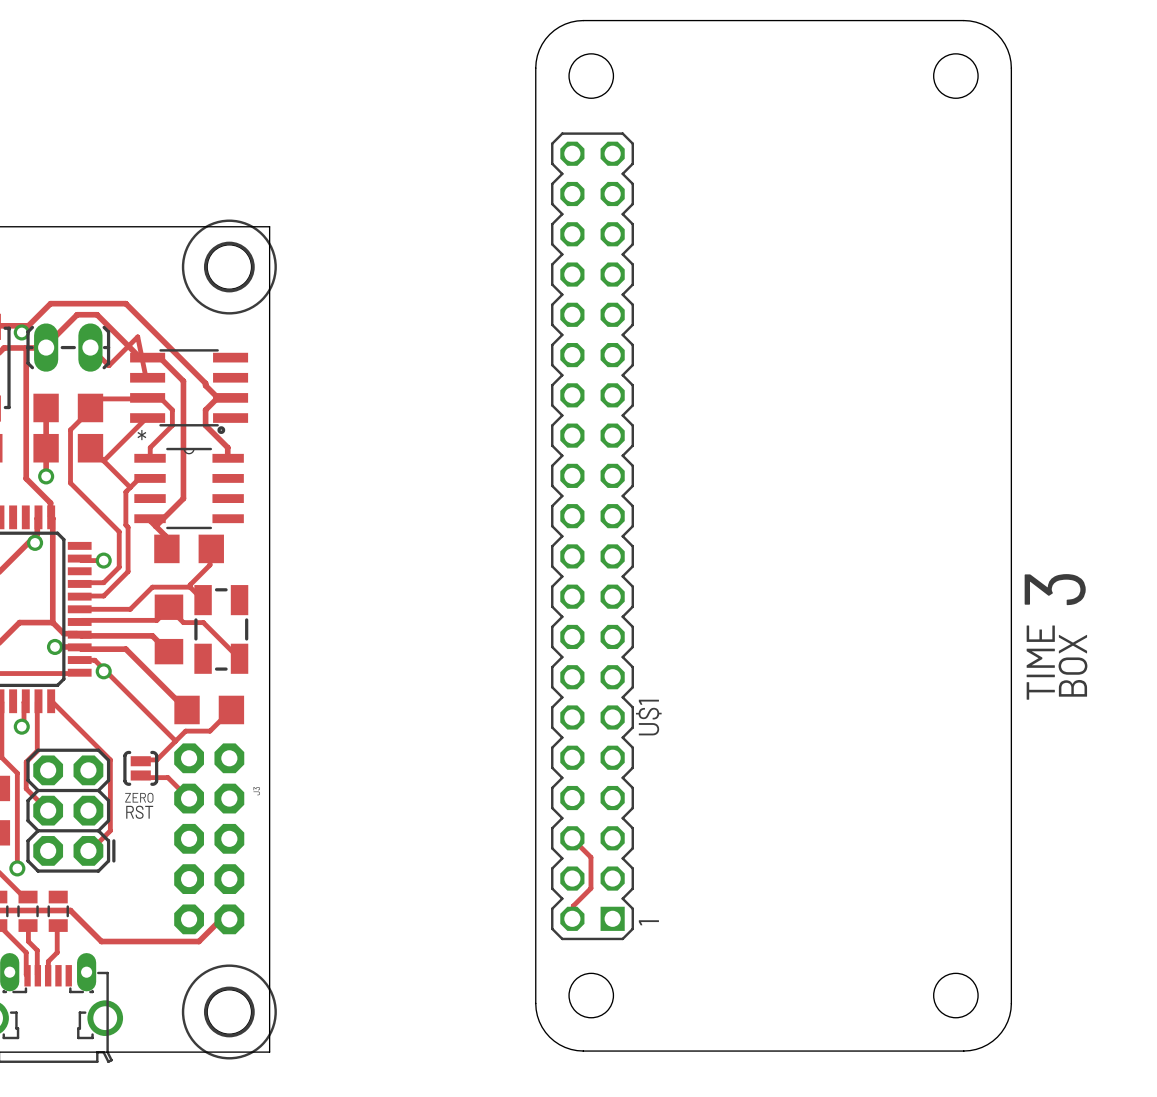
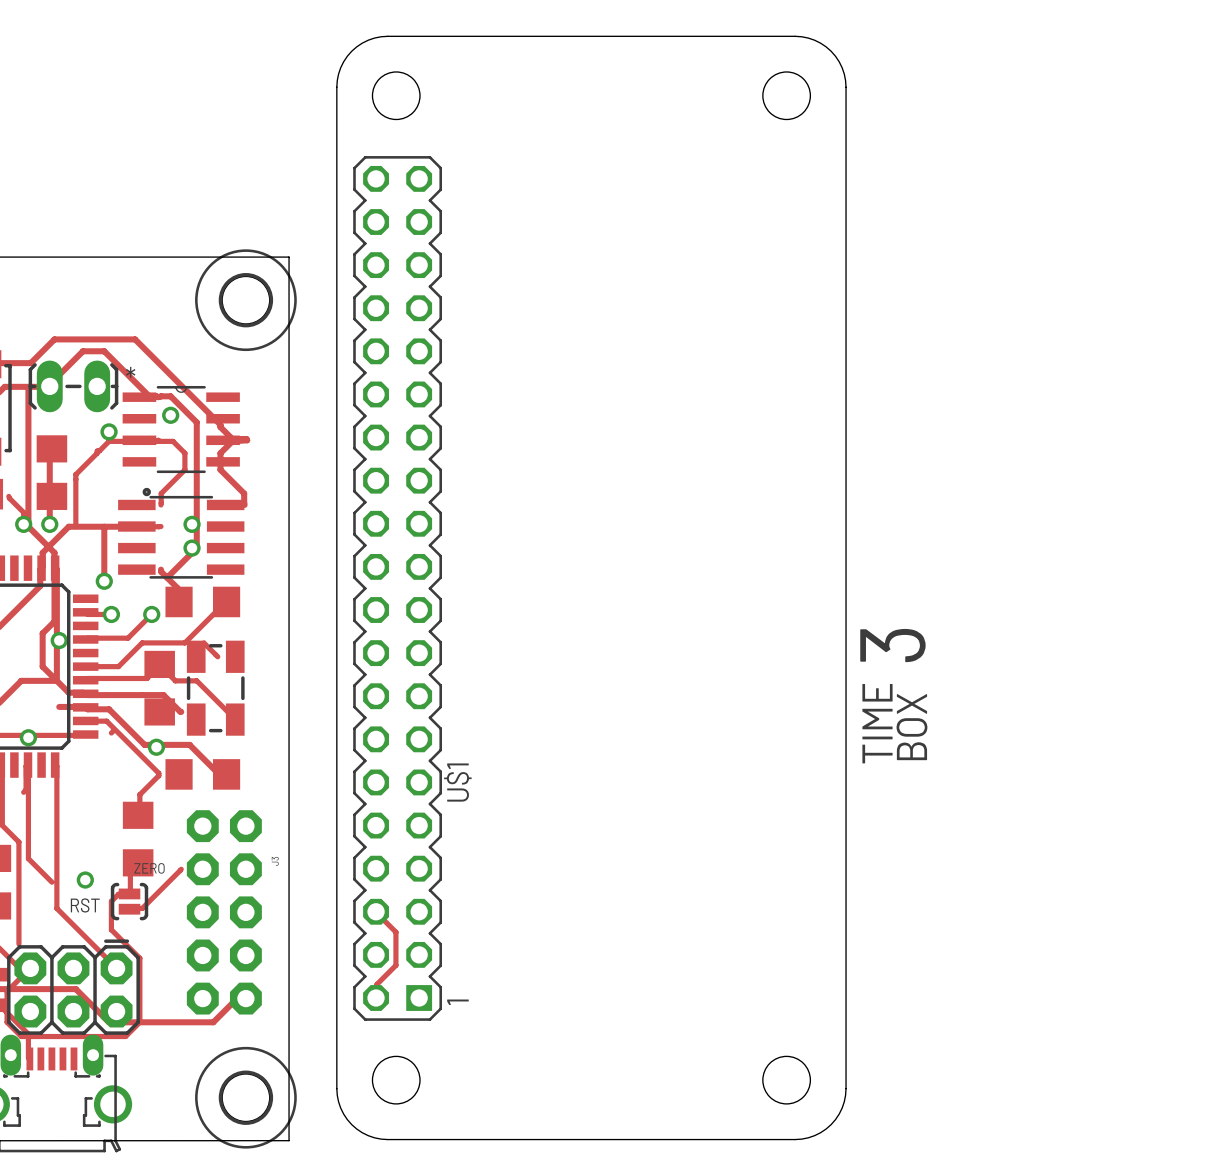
via: (21, 332) -> none
track: (90, 347) (108, 365) (137, 336) (145, 376) (147, 377) -> none
via: none -> (170, 415)
via: none -> (109, 431)
part rotation: 0° (189, 391) -> 180° (181, 533)
part position: (189, 391) -> (181, 533)
part: (68, 407) -> none
track: (147, 418) (103, 460) -> none
part: none -> (51, 472)
part: (68, 448) -> none
track: (90, 448) (130, 487) -> none
track: none -> (8, 496) (23, 512) (23, 524)
via: none -> (23, 524)
via: none -> (192, 524)
track: (70, 478) (70, 483) (119, 531) (119, 567) (103, 582) -> (151, 614) (128, 638) (111, 638)
track: none -> (104, 526) (104, 581)
track: (139, 478) (125, 491) (128, 571) (103, 596) (79, 596) -> (149, 526) (68, 526) (42, 552) (41, 568)
part position: (189, 488) -> (181, 429)
via: none -> (192, 548)
track: none -> (55, 568) (54, 621) (42, 633) (42, 666) (56, 680)
via: none -> (104, 581)
U$1 position: (773, 535) -> (591, 587)
via: (35, 542) -> none
track: (210, 549) (210, 565) (190, 587) (172, 587) -> (225, 602) (184, 642)
via: none -> (151, 614)
via: none -> (59, 640)
track: (152, 587) (130, 609) (110, 609) -> (163, 642) (142, 642) (118, 666)
text position: 3 (1055, 589) -> 3 (892, 645)
track: (136, 620) (156, 620) (168, 607) (183, 622) (203, 622) (239, 658) -> (146, 678) (159, 664) (175, 680) (196, 680) (235, 719)
part position: (168, 629) -> (159, 688)
part position: (221, 629) -> (215, 688)
via: (55, 646) -> none
track: (101, 649) (125, 649) (187, 709) -> (109, 709) (144, 744) (189, 744) (218, 773) (226, 774)
track: (94, 660) (175, 741) -> (101, 721) (106, 721) (158, 773) (158, 775) (139, 794) (139, 813) (138, 815)
text position: TIME (1040, 662) -> TIME (877, 723)
text position: BOX (1072, 665) -> BOX (911, 727)
via: (103, 671) -> none
via: none -> (28, 737)
via: none -> (156, 747)
track: (38, 701) (37, 751) (26, 762) -> (27, 765) (28, 830)
track: (52, 702) (110, 759) (110, 830) (88, 850) -> (56, 766) (56, 908) (116, 968)
part position: (209, 709) -> (202, 774)
track: (231, 709) (210, 731) (185, 731) (156, 759) (140, 761) -> none
via: (21, 726) -> none
part footprint: [123, 750, 159, 786] -> [122, 801, 154, 877]
track: (140, 775) (141, 777) (167, 777) (189, 798) -> none
track: none -> (138, 862) (130, 870) (129, 893) (118, 894) (111, 901) (111, 929) (139, 958) (139, 1022) (125, 1036) (21, 1036) (7, 1022) (7, 991) (30, 968)
track: none -> (181, 869) (142, 908) (129, 909)
via: none -> (85, 880)
part: (70, 810) -> none
text position: RST (139, 812) -> RST (85, 905)
part: none -> (129, 901)
track: (572, 838) (590, 857) (590, 888) (573, 906) (572, 918) -> (376, 911) (395, 932) (395, 965) (376, 984) (376, 998)
via: (17, 868) -> none
part footprint: [47, 890, 69, 932] -> [7, 939, 140, 1035]
part: (28, 911) -> none
track: (28, 925) (28, 941) (37, 950) (37, 975) -> none
track: (58, 925) (57, 952) (48, 961) (48, 975) -> none

